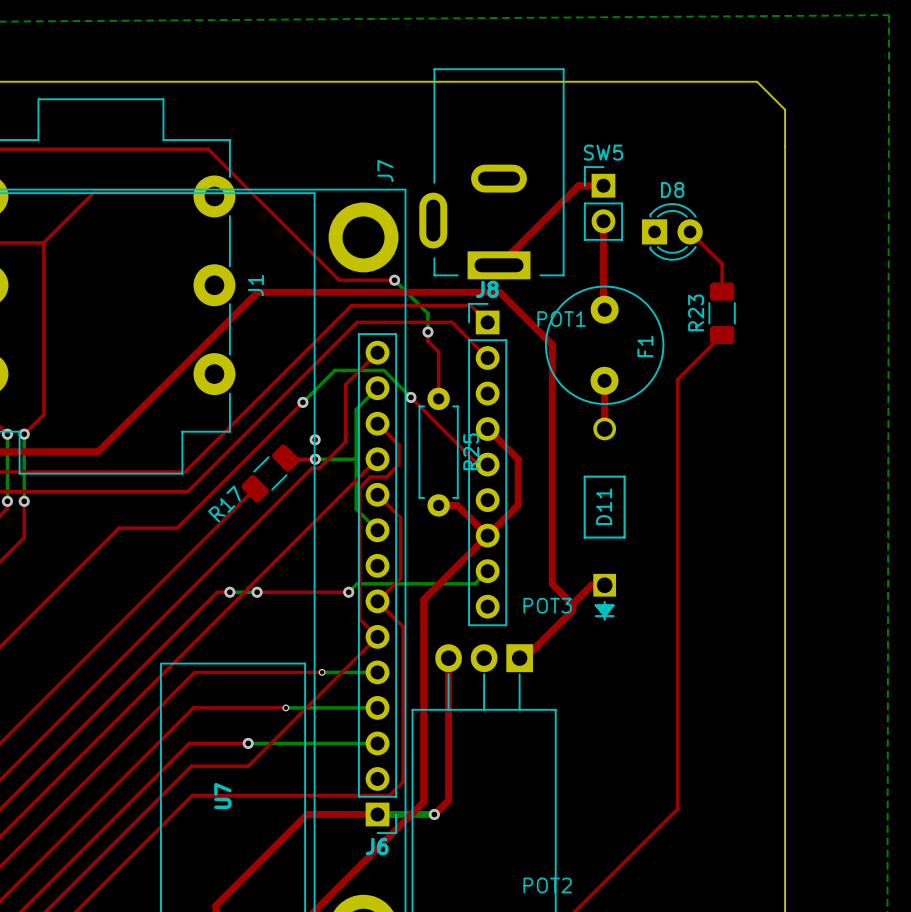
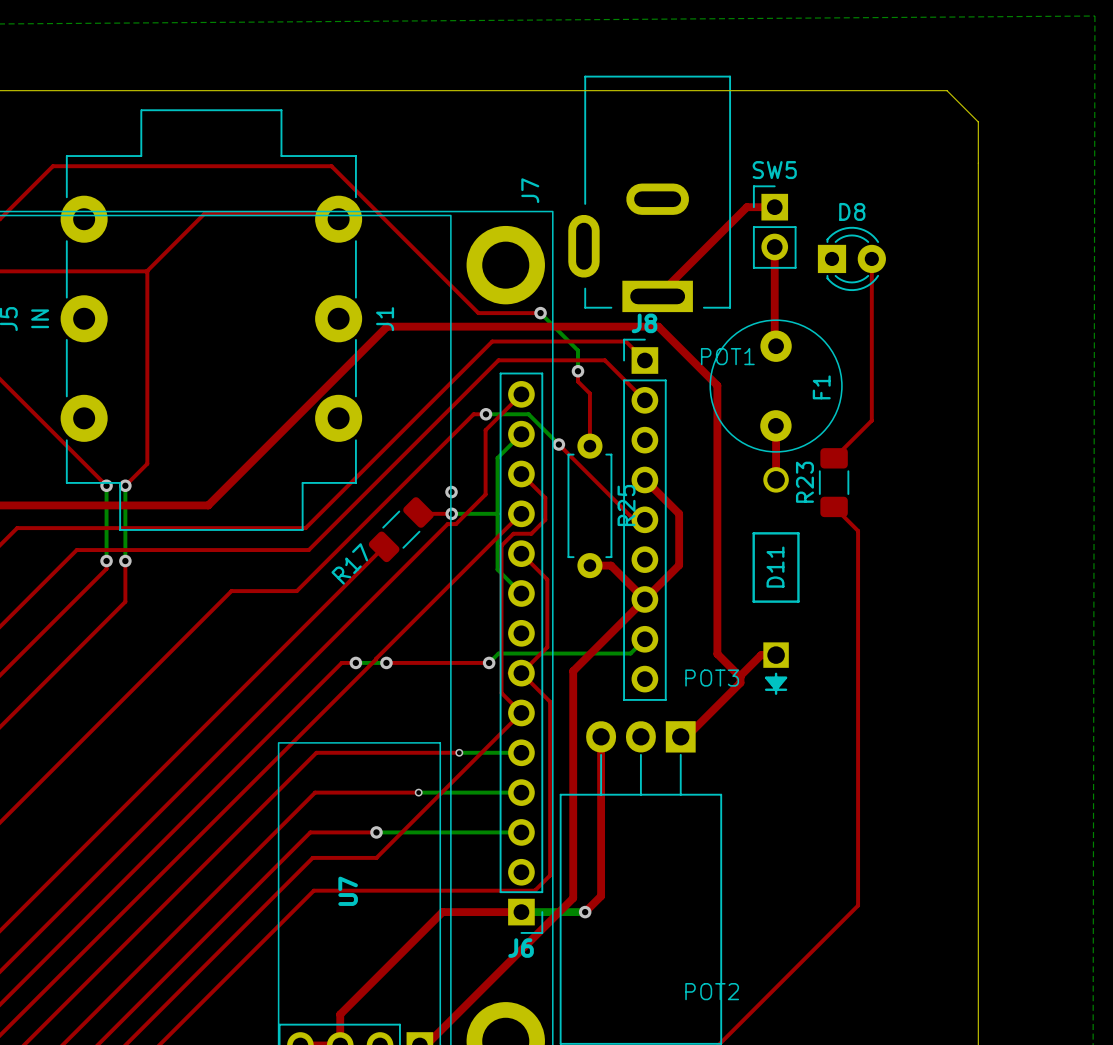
top track: (690, 231) (722, 263) (722, 291) -> (871, 258) (871, 420) (834, 458)
R23 position: (722, 313) -> (834, 482)
top track: (722, 334) (677, 379) (677, 474) -> (834, 506) (858, 530)
top track: none -> (486, 414) (473, 414) (437, 450)
bottom track: (345, 370) (334, 370) (302, 402) -> none
via position: (302, 402) -> (486, 414)

